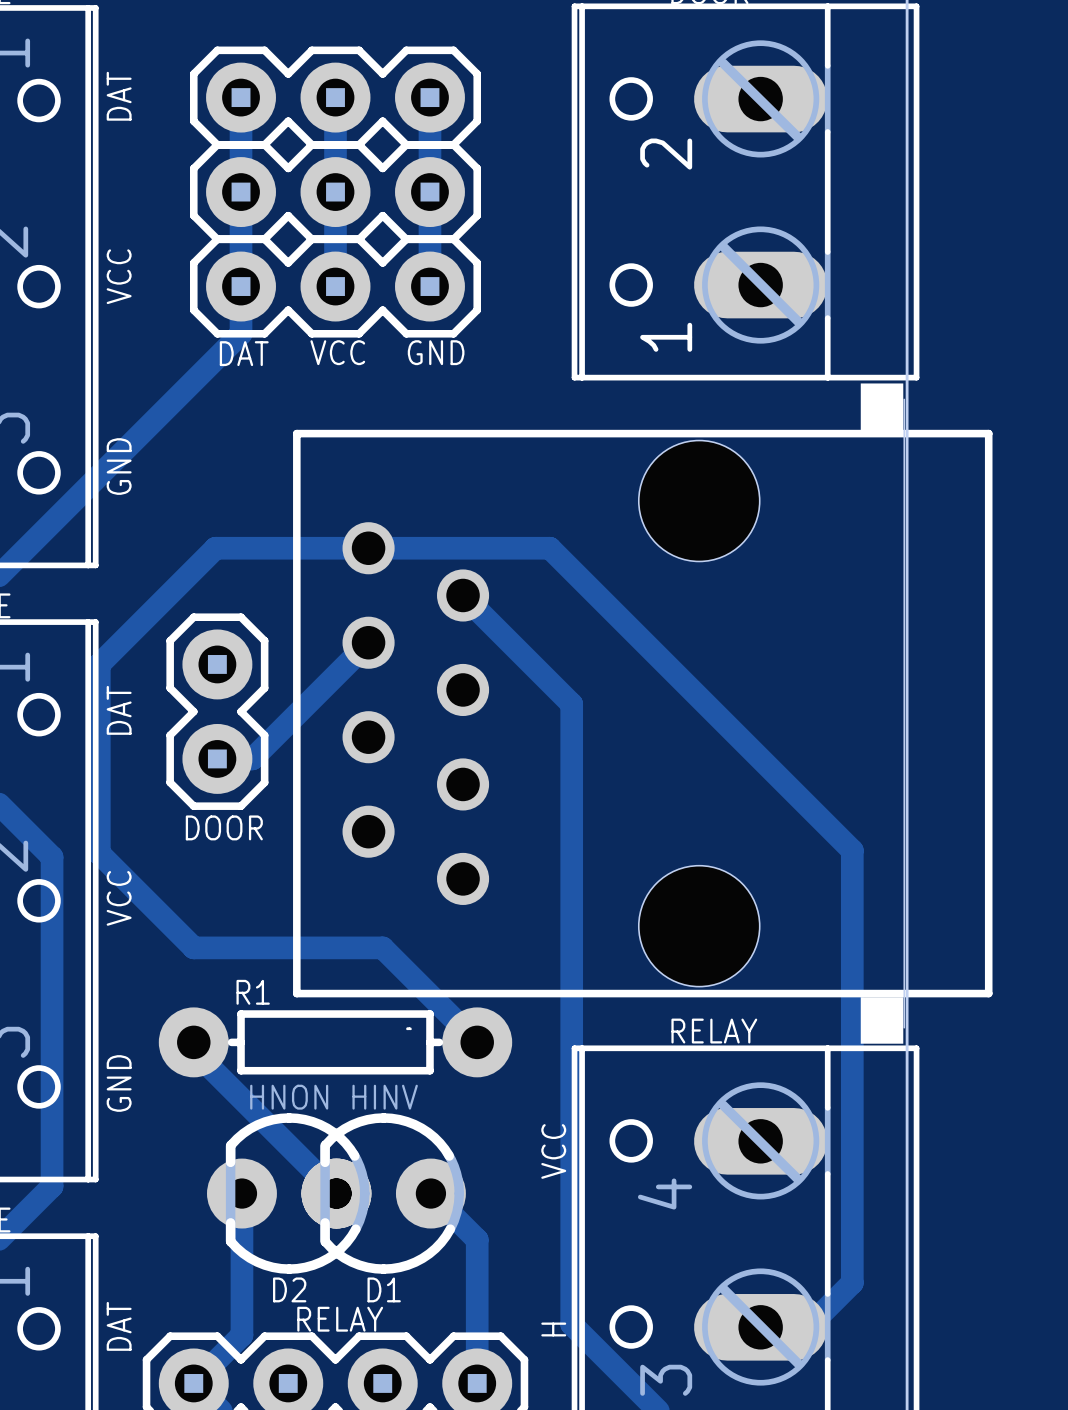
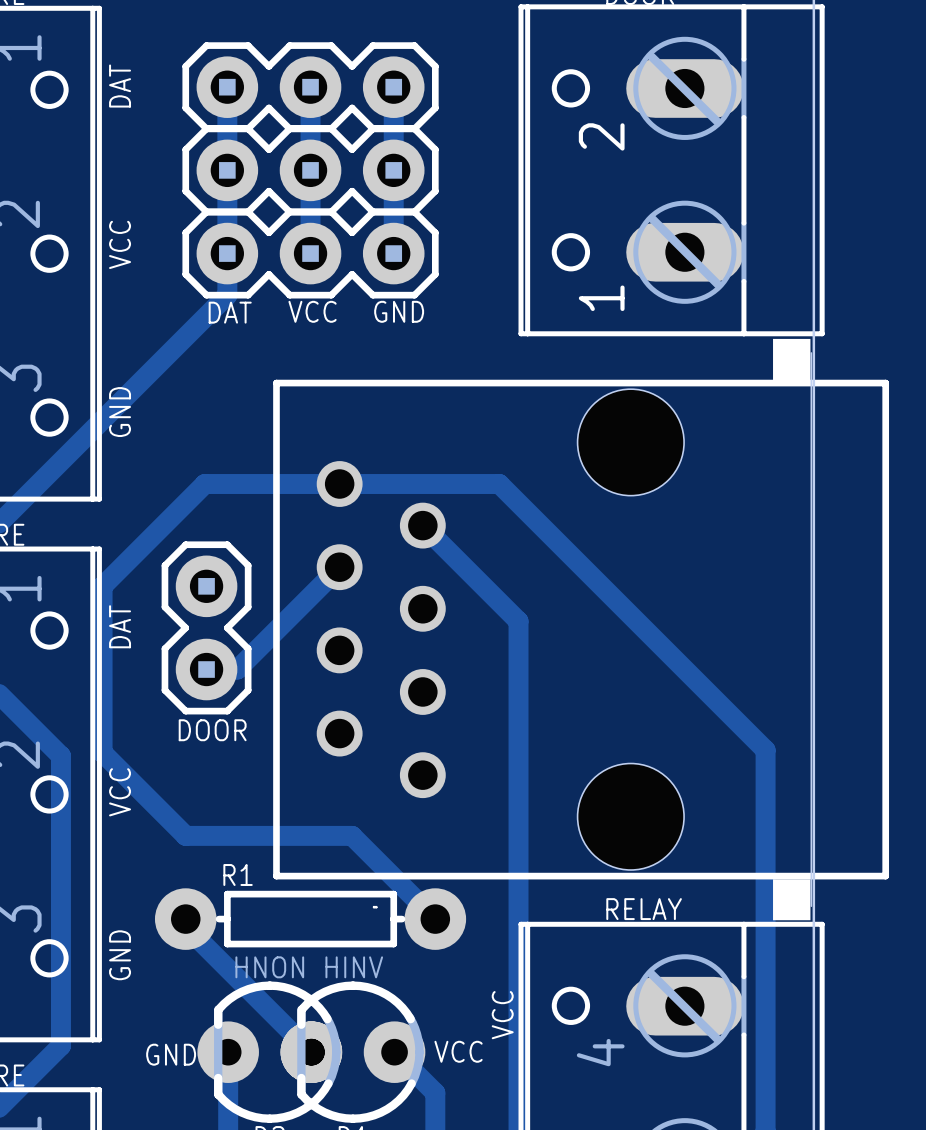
text: none -> VCC (458, 1051)
text: none -> GND (171, 1054)

